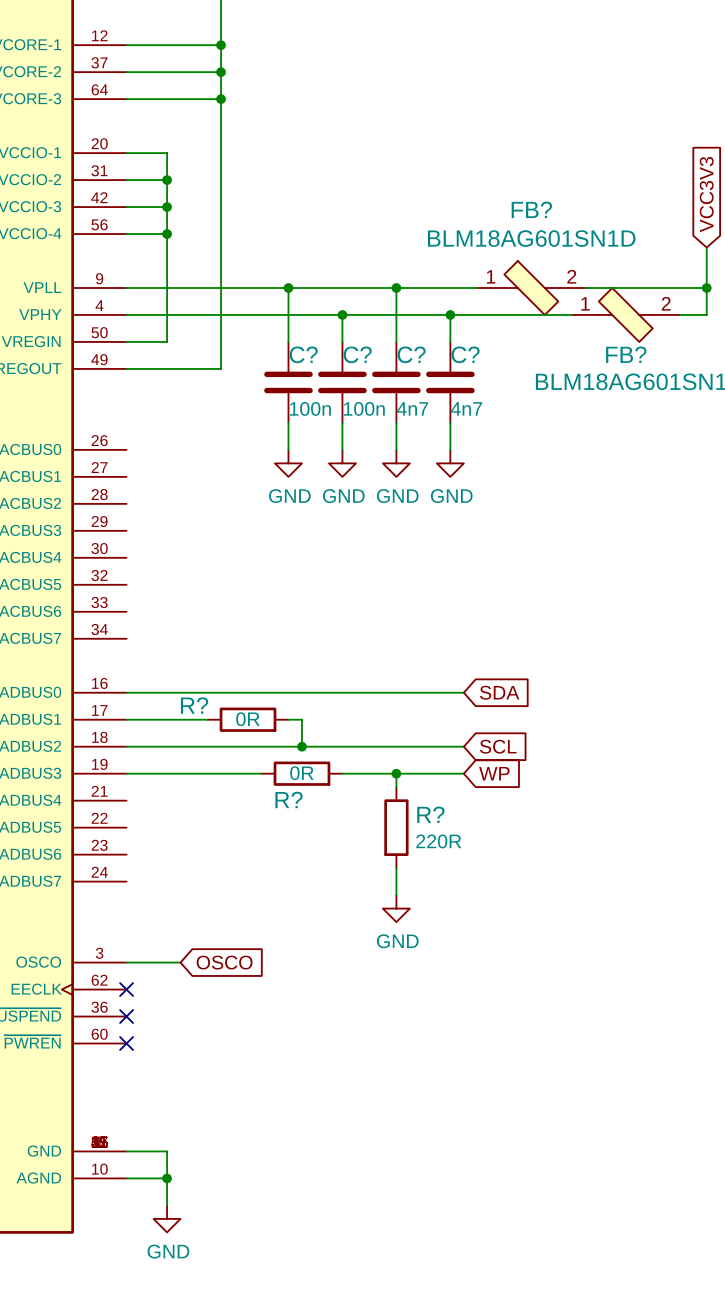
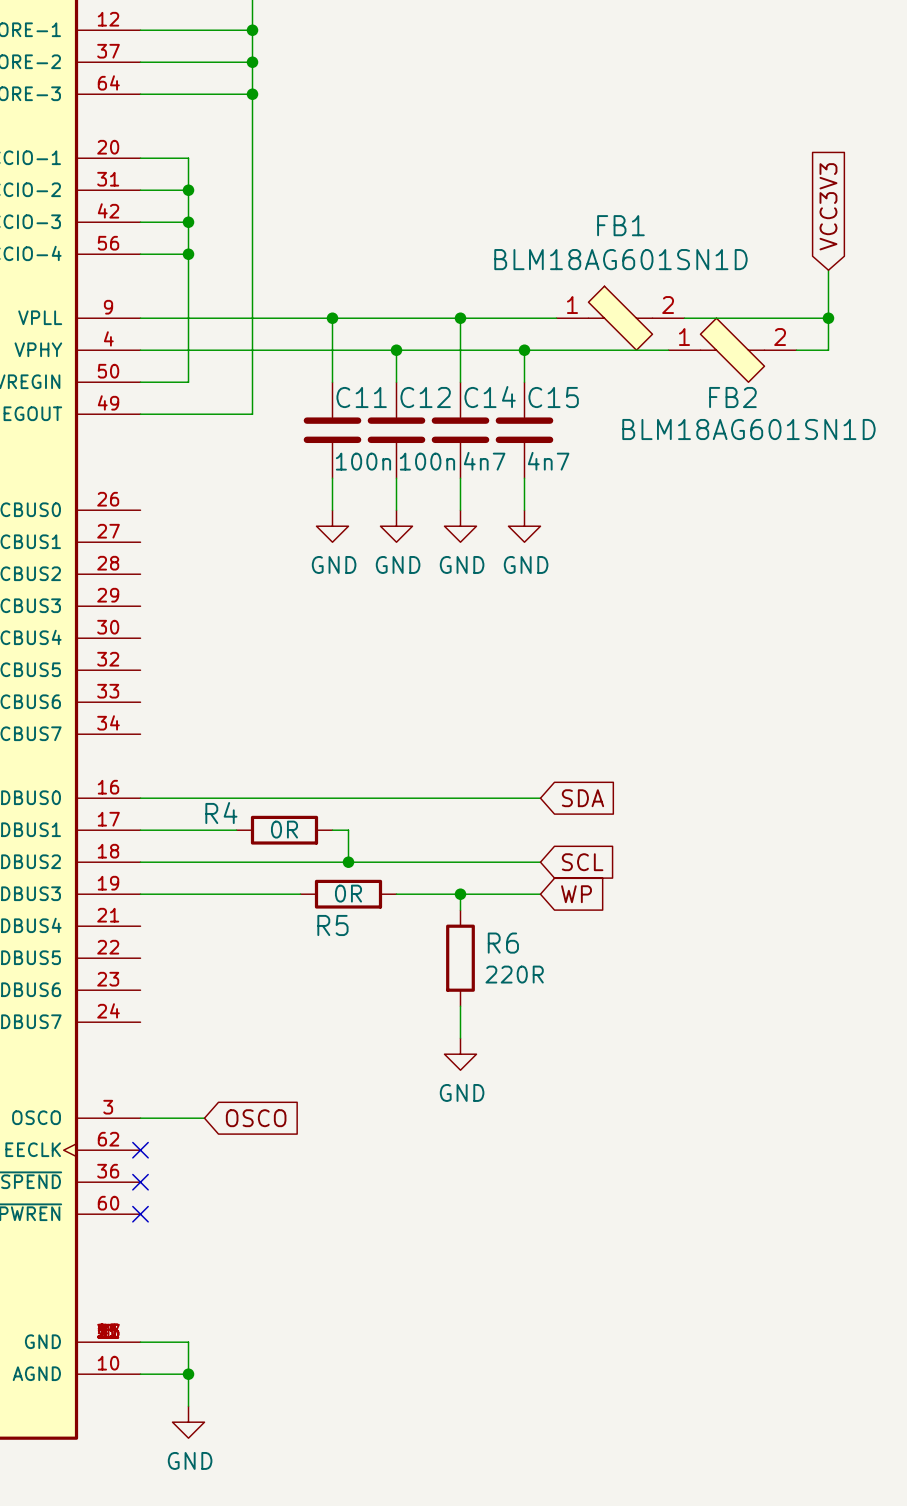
FB? name: FB? (531, 209) -> FB1 (620, 225)
C? name: C? (303, 354) -> C11 (361, 397)
C? name: C? (357, 354) -> C12 (425, 397)
C? name: C? (411, 354) -> C14 (490, 397)
C? name: C? (465, 354) -> C15 (553, 397)
FB? name: FB? (626, 354) -> FB2 (732, 397)
R? name: R? (194, 705) -> R4 (221, 813)
R? name: R? (289, 799) -> R5 (332, 925)
R? name: R? (430, 814) -> R6 (503, 943)

